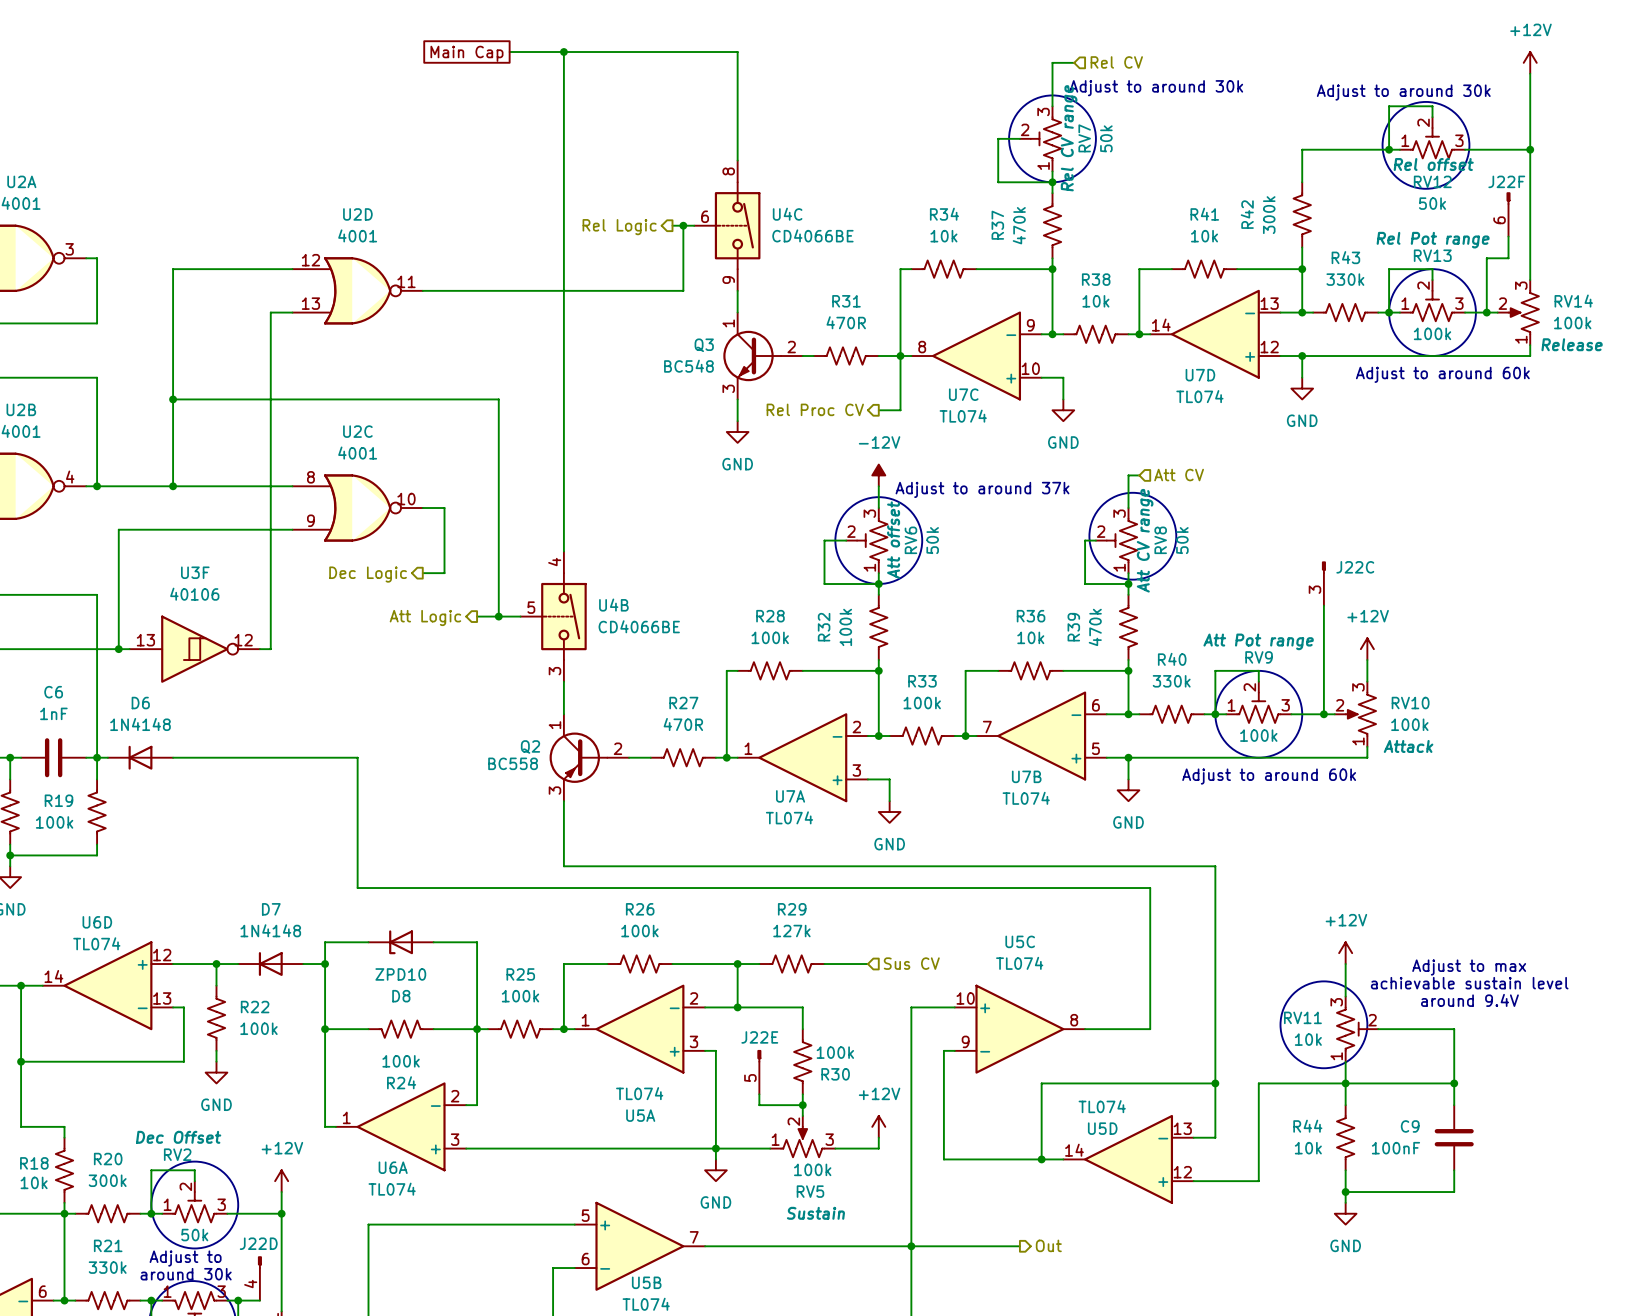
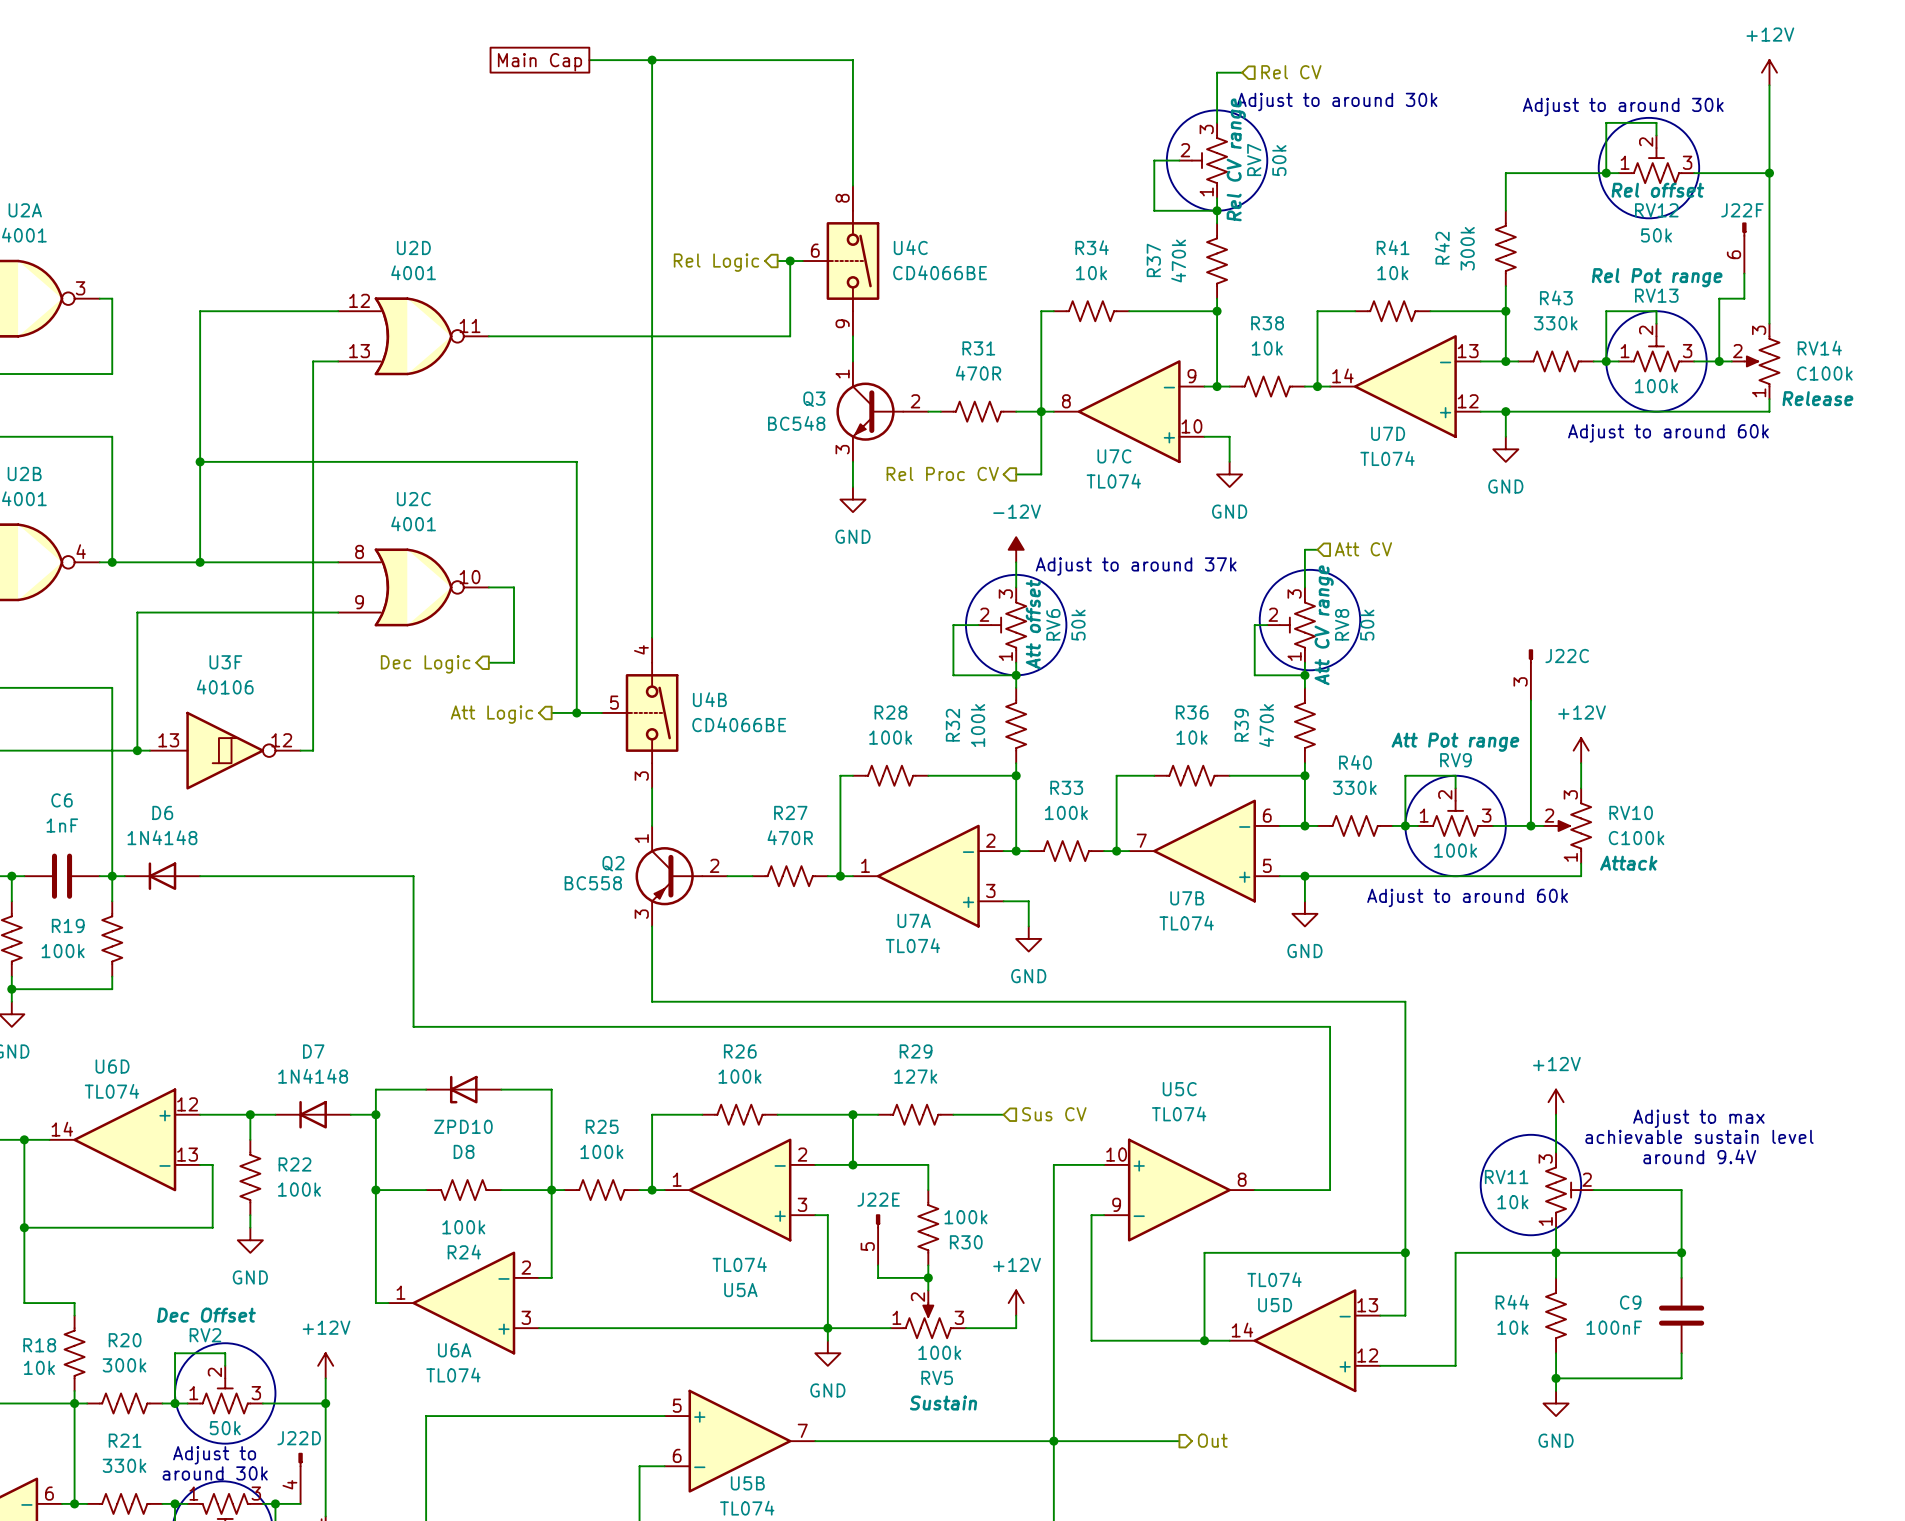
RV14 value: 100k (1572, 323) -> C100k (1824, 373)
RV10 value: 100k (1409, 724) -> C100k (1636, 838)

